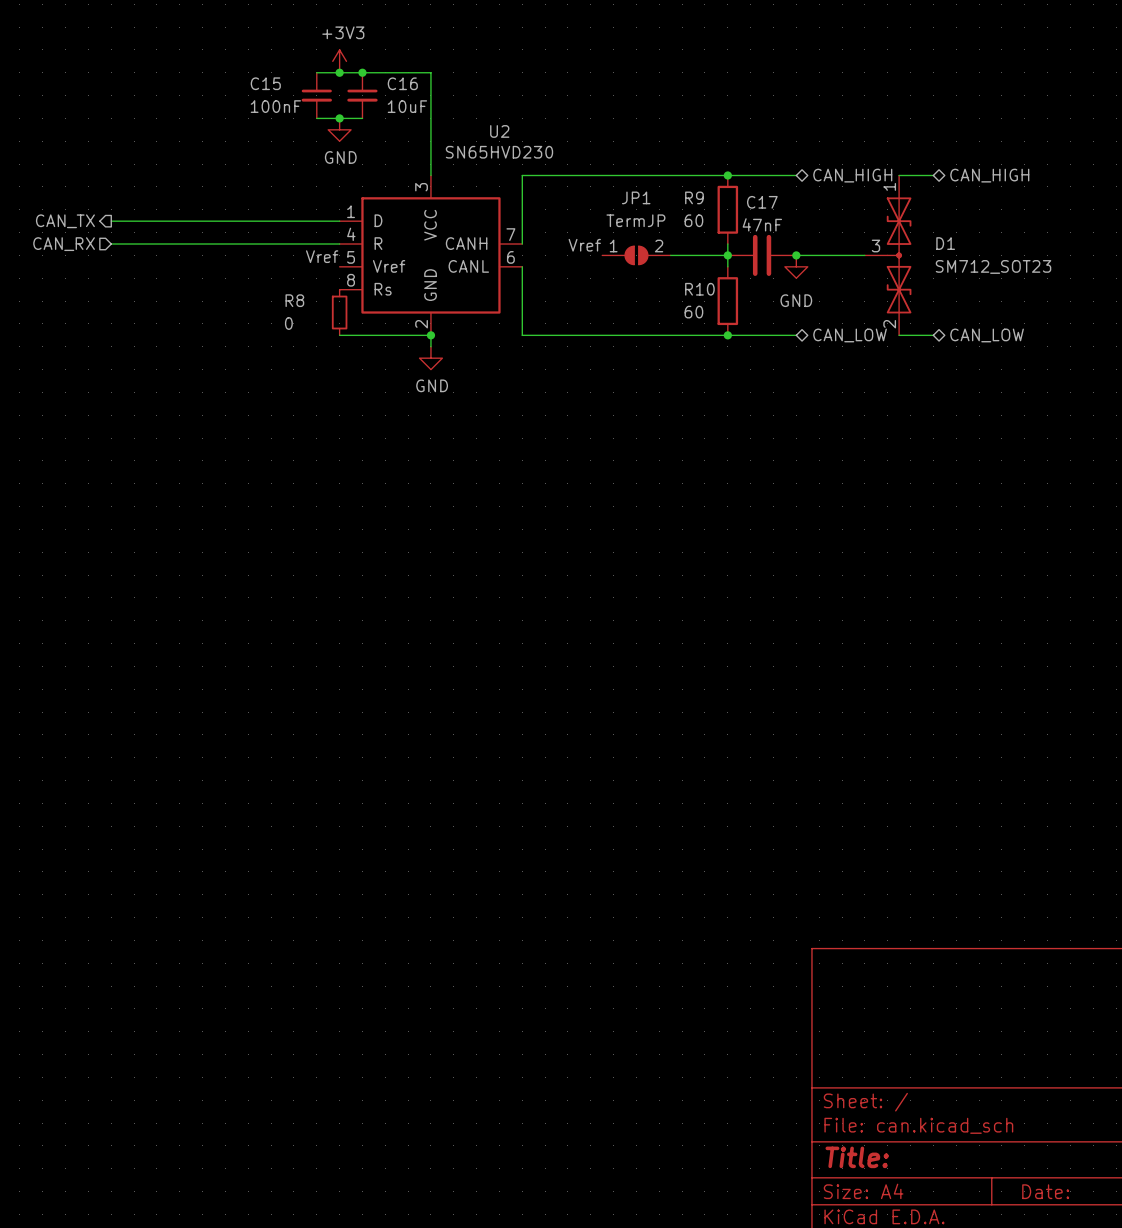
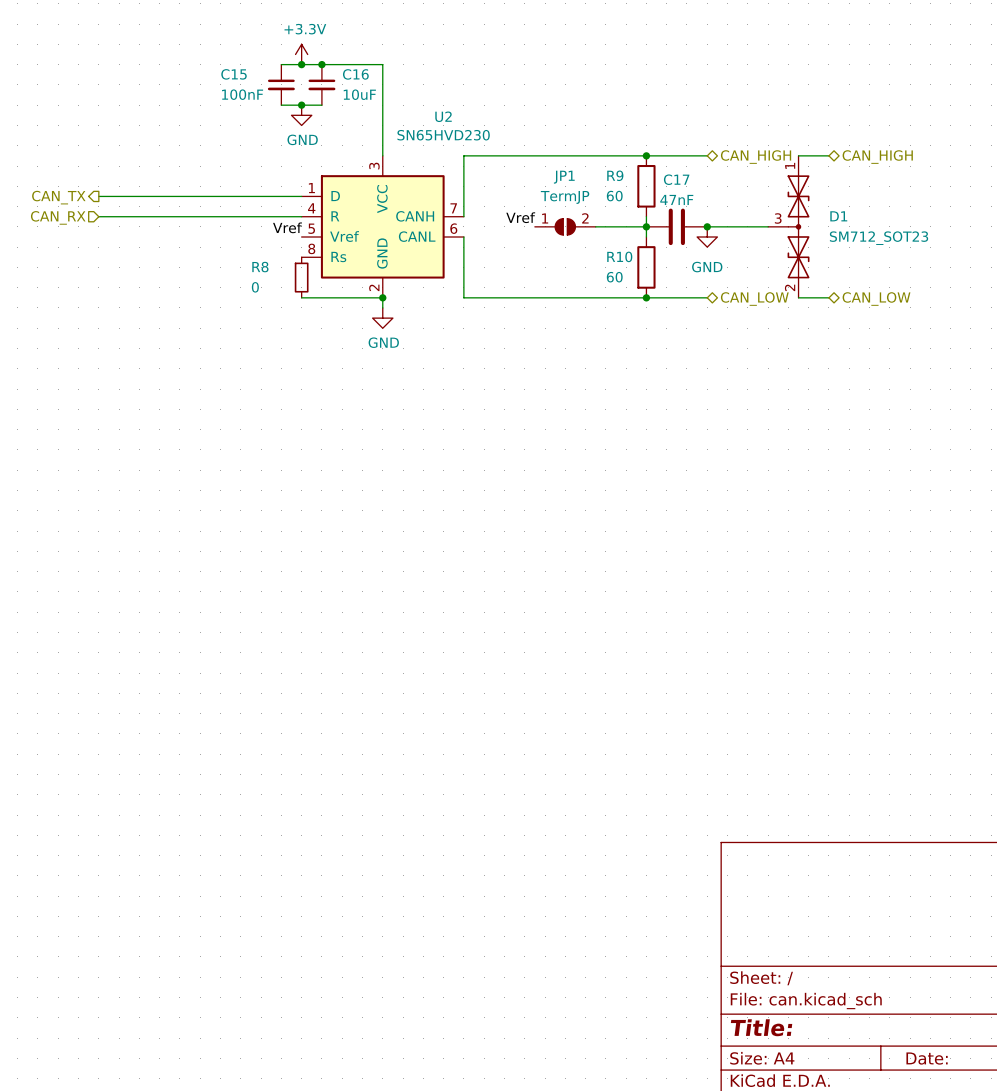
power symbol: +3V3 (339, 61) -> +3.3V (301, 54)

